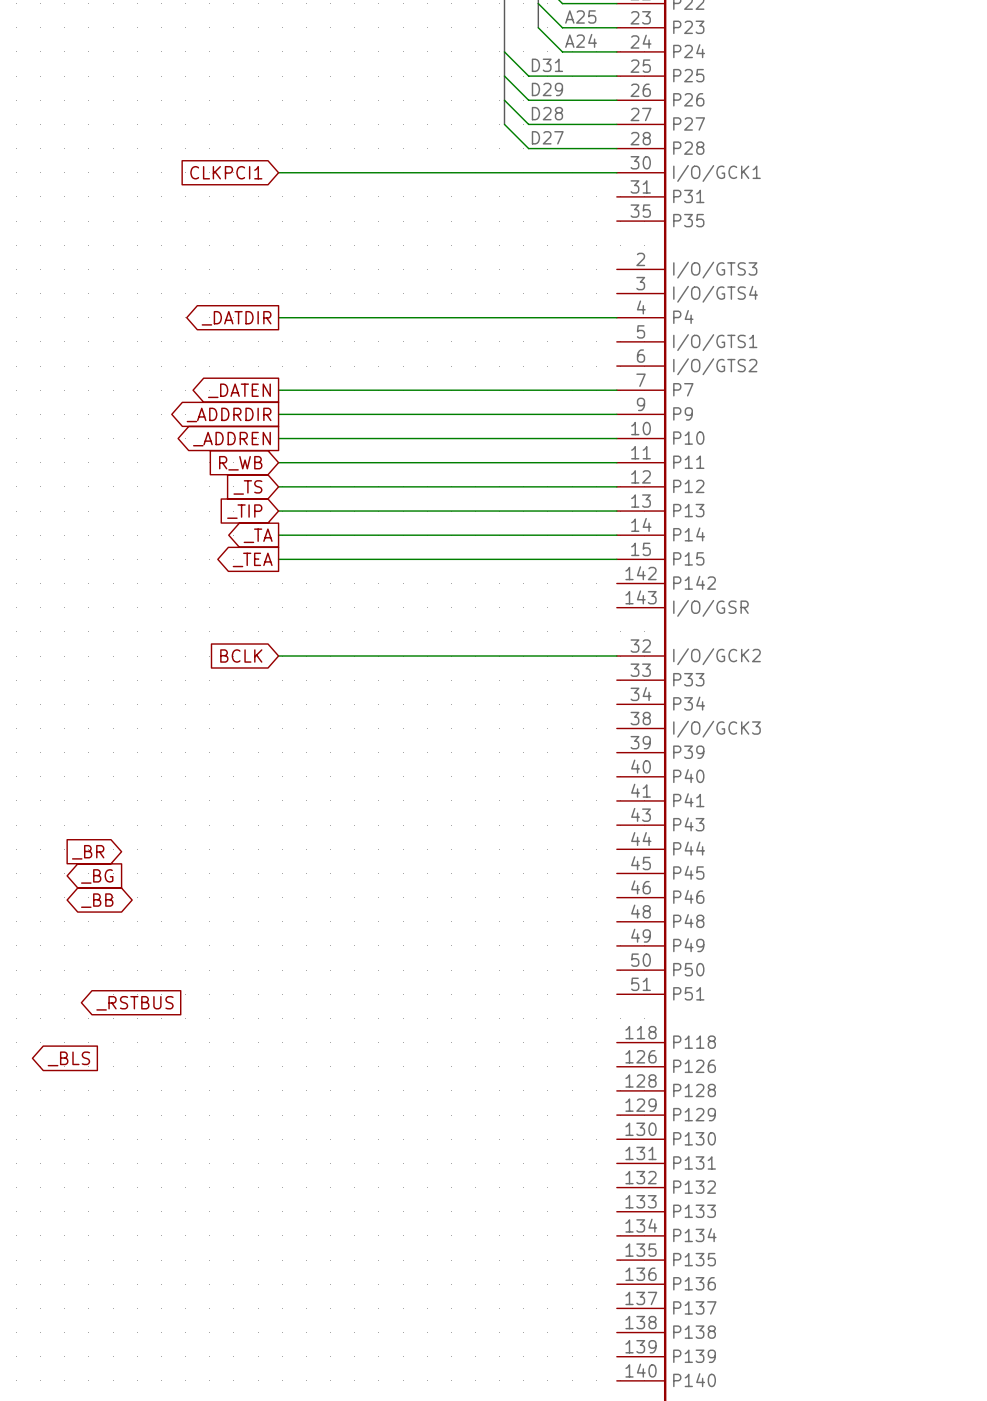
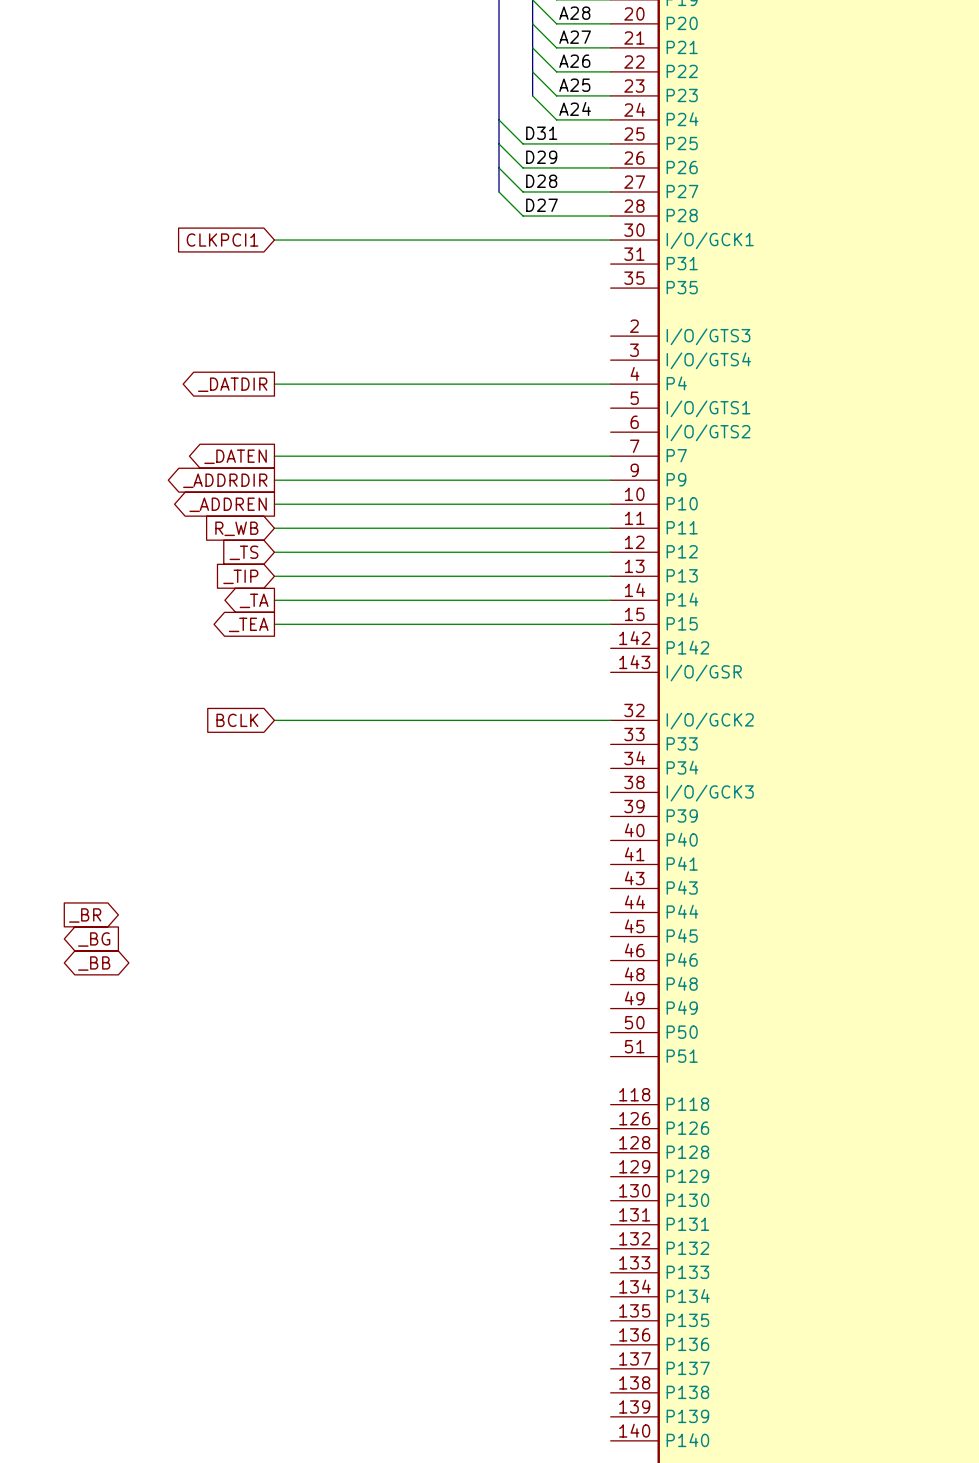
global label: _RSTBUS (134, 1003) -> none
global label: _BLS (68, 1058) -> none

